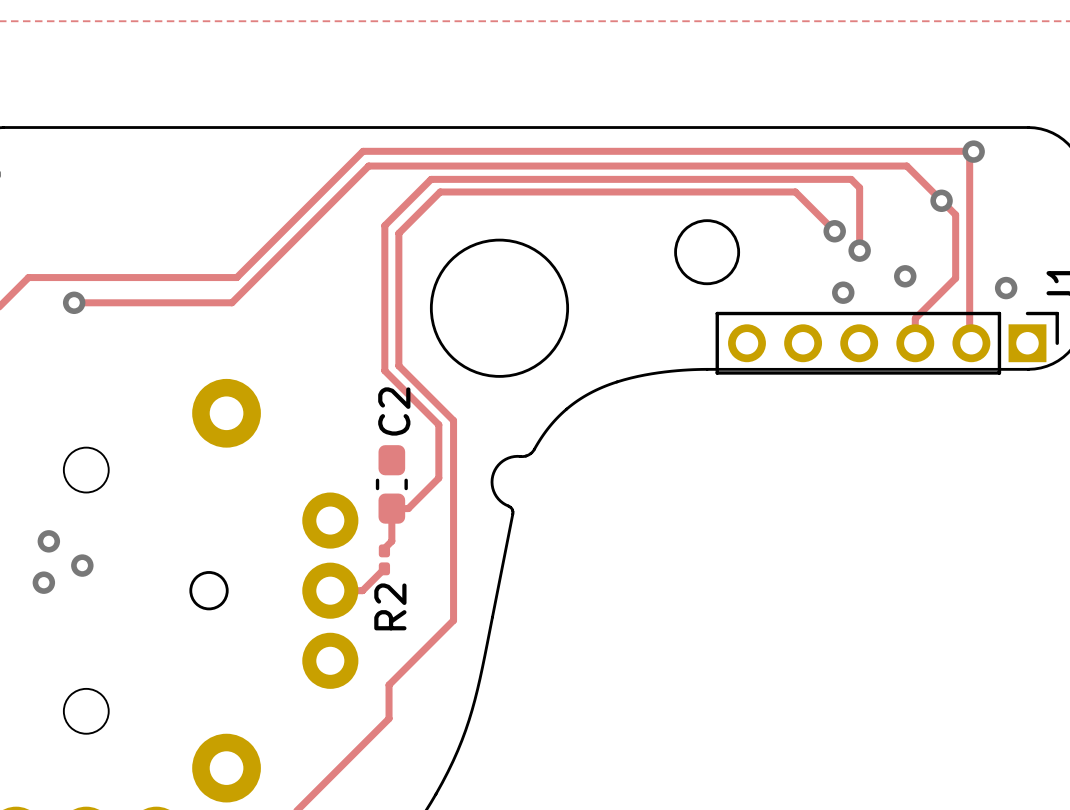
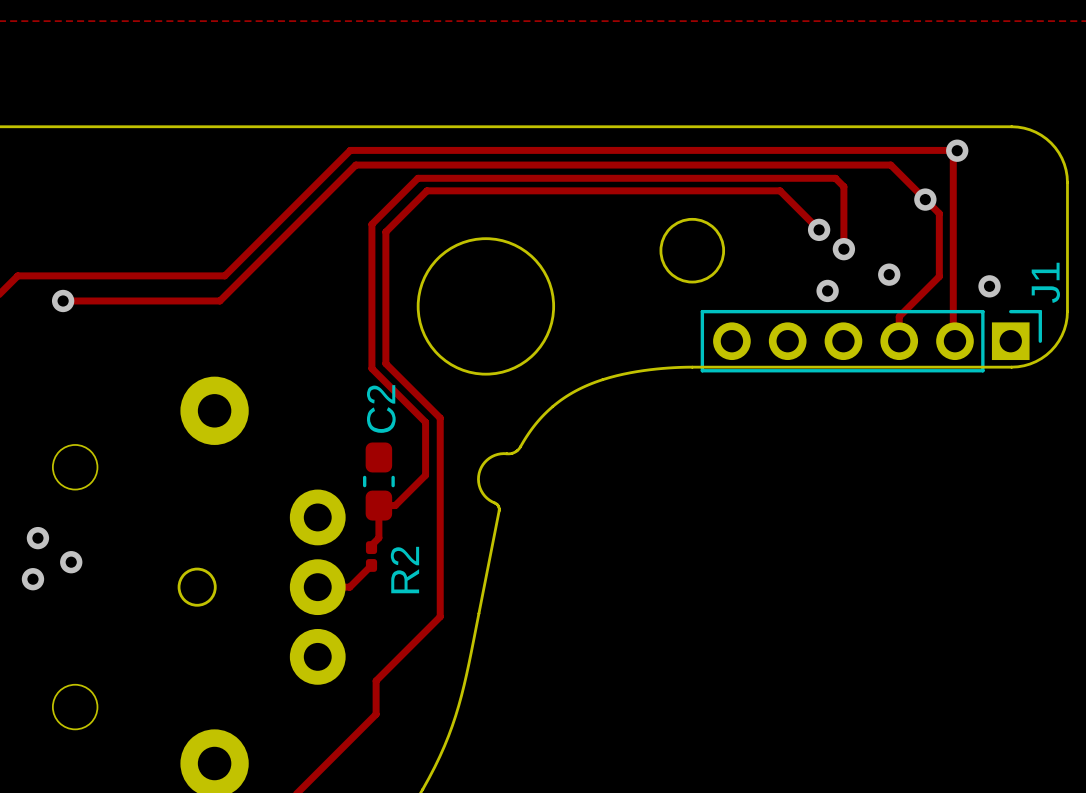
R2 name position: R2 (390, 606) -> R2 (404, 570)

